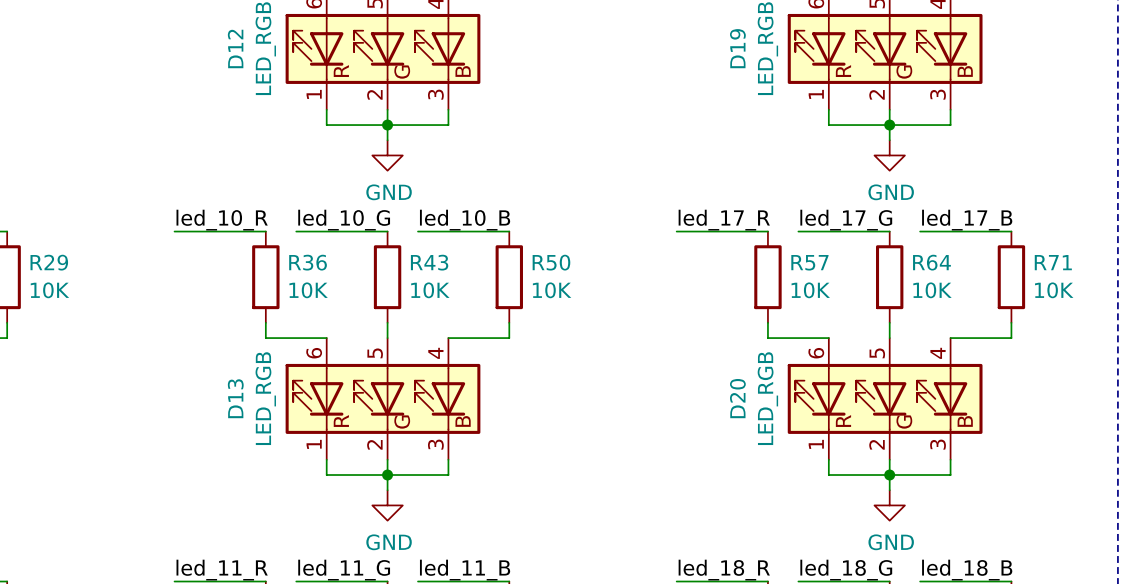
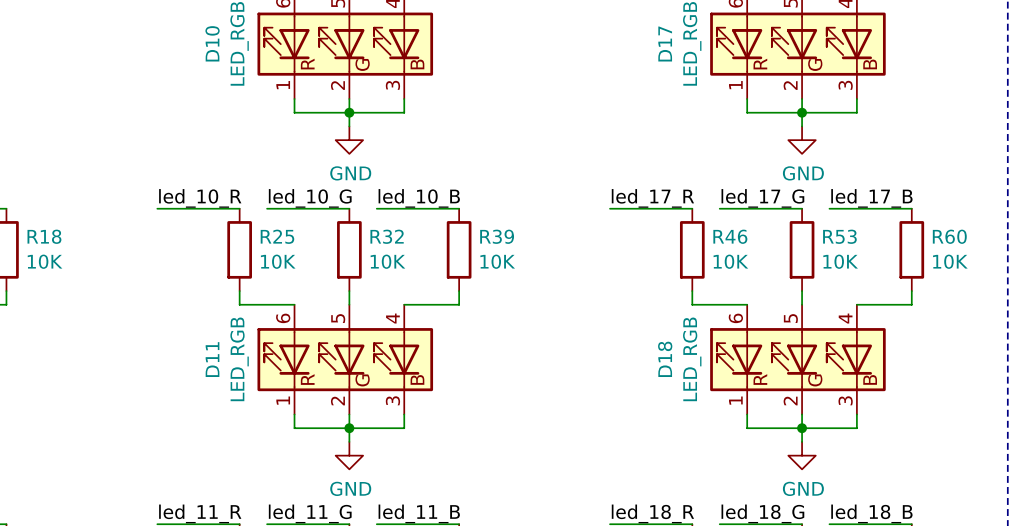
D12 name: D12 (235, 48) -> D10 (212, 43)
D19 name: D19 (737, 48) -> D17 (665, 44)
R29 name: R29 (49, 262) -> R18 (44, 236)
R36 name: R36 (308, 262) -> R25 (277, 236)
R43 name: R43 (429, 262) -> R32 (387, 236)
R50 name: R50 (551, 262) -> R39 (497, 236)
R57 name: R57 (809, 262) -> R46 (730, 236)
R64 name: R64 (931, 262) -> R53 (839, 236)
R71 name: R71 (1053, 262) -> R60 (949, 236)
D13 name: D13 (235, 398) -> D11 (212, 359)
D20 name: D20 (737, 398) -> D18 (665, 359)

